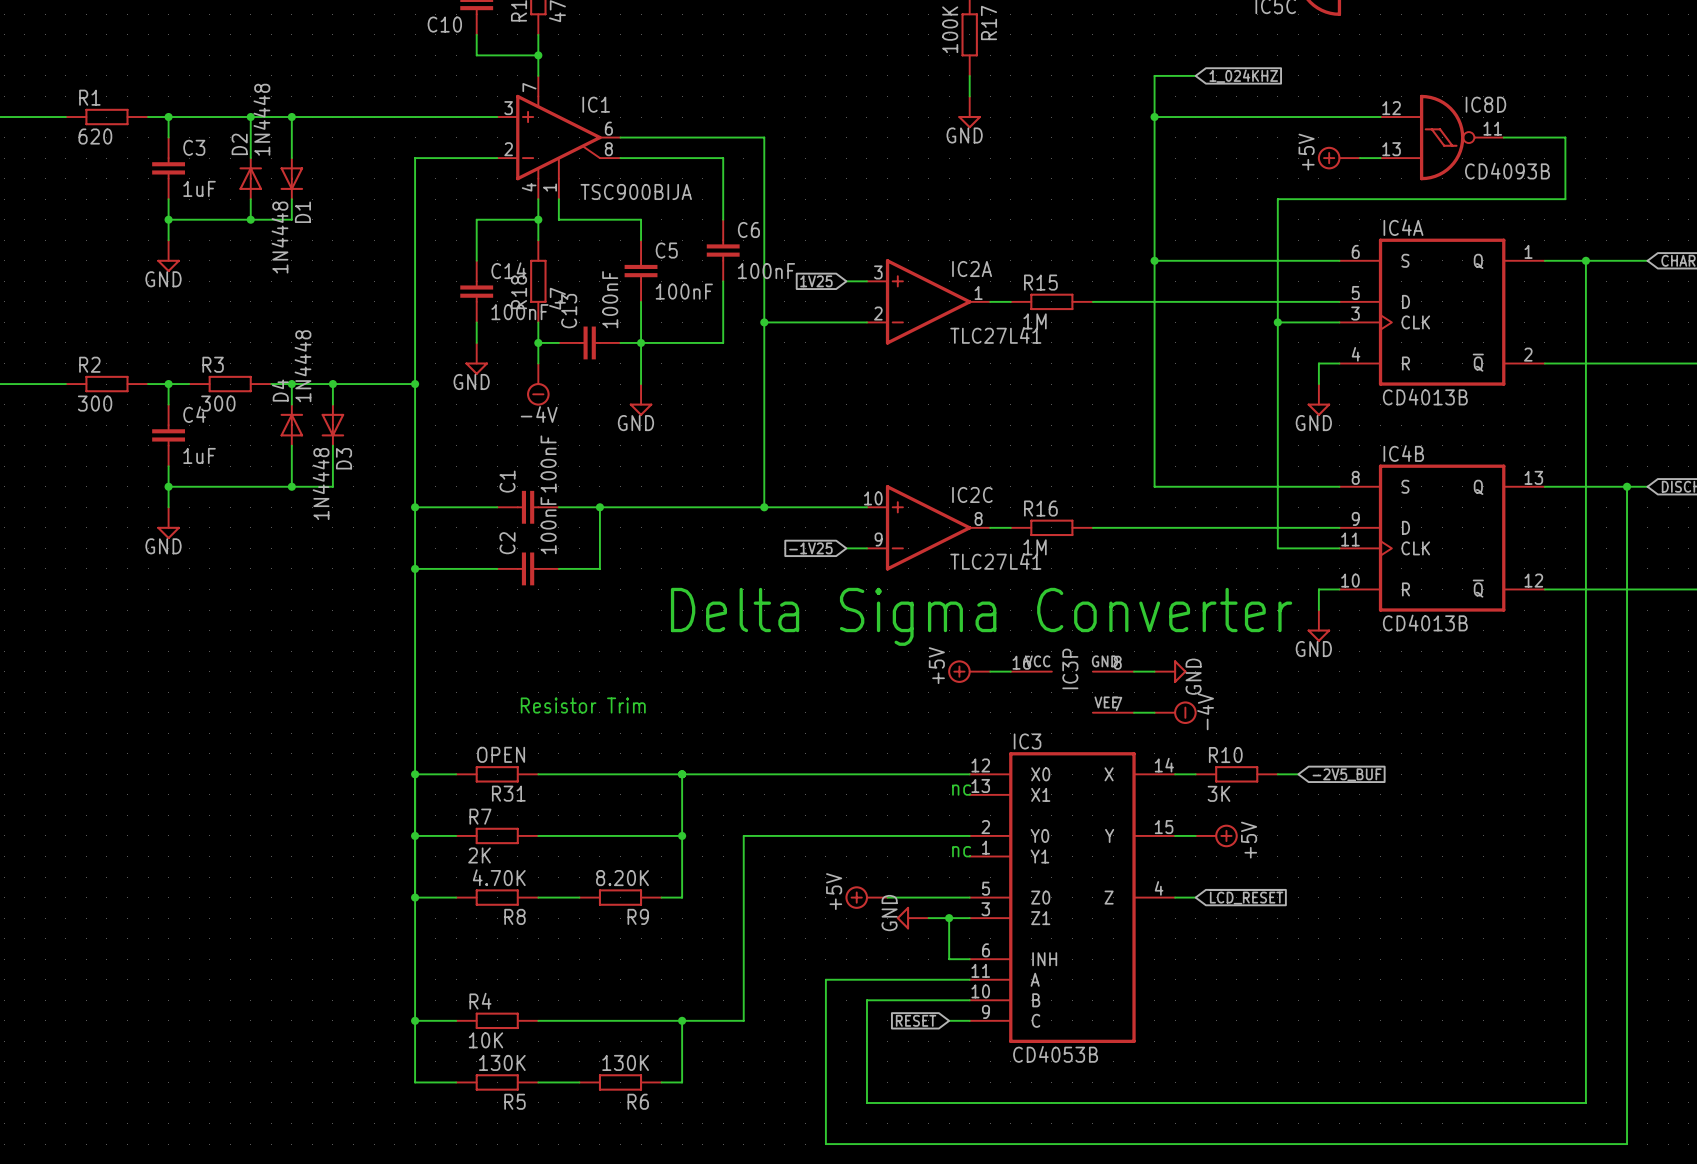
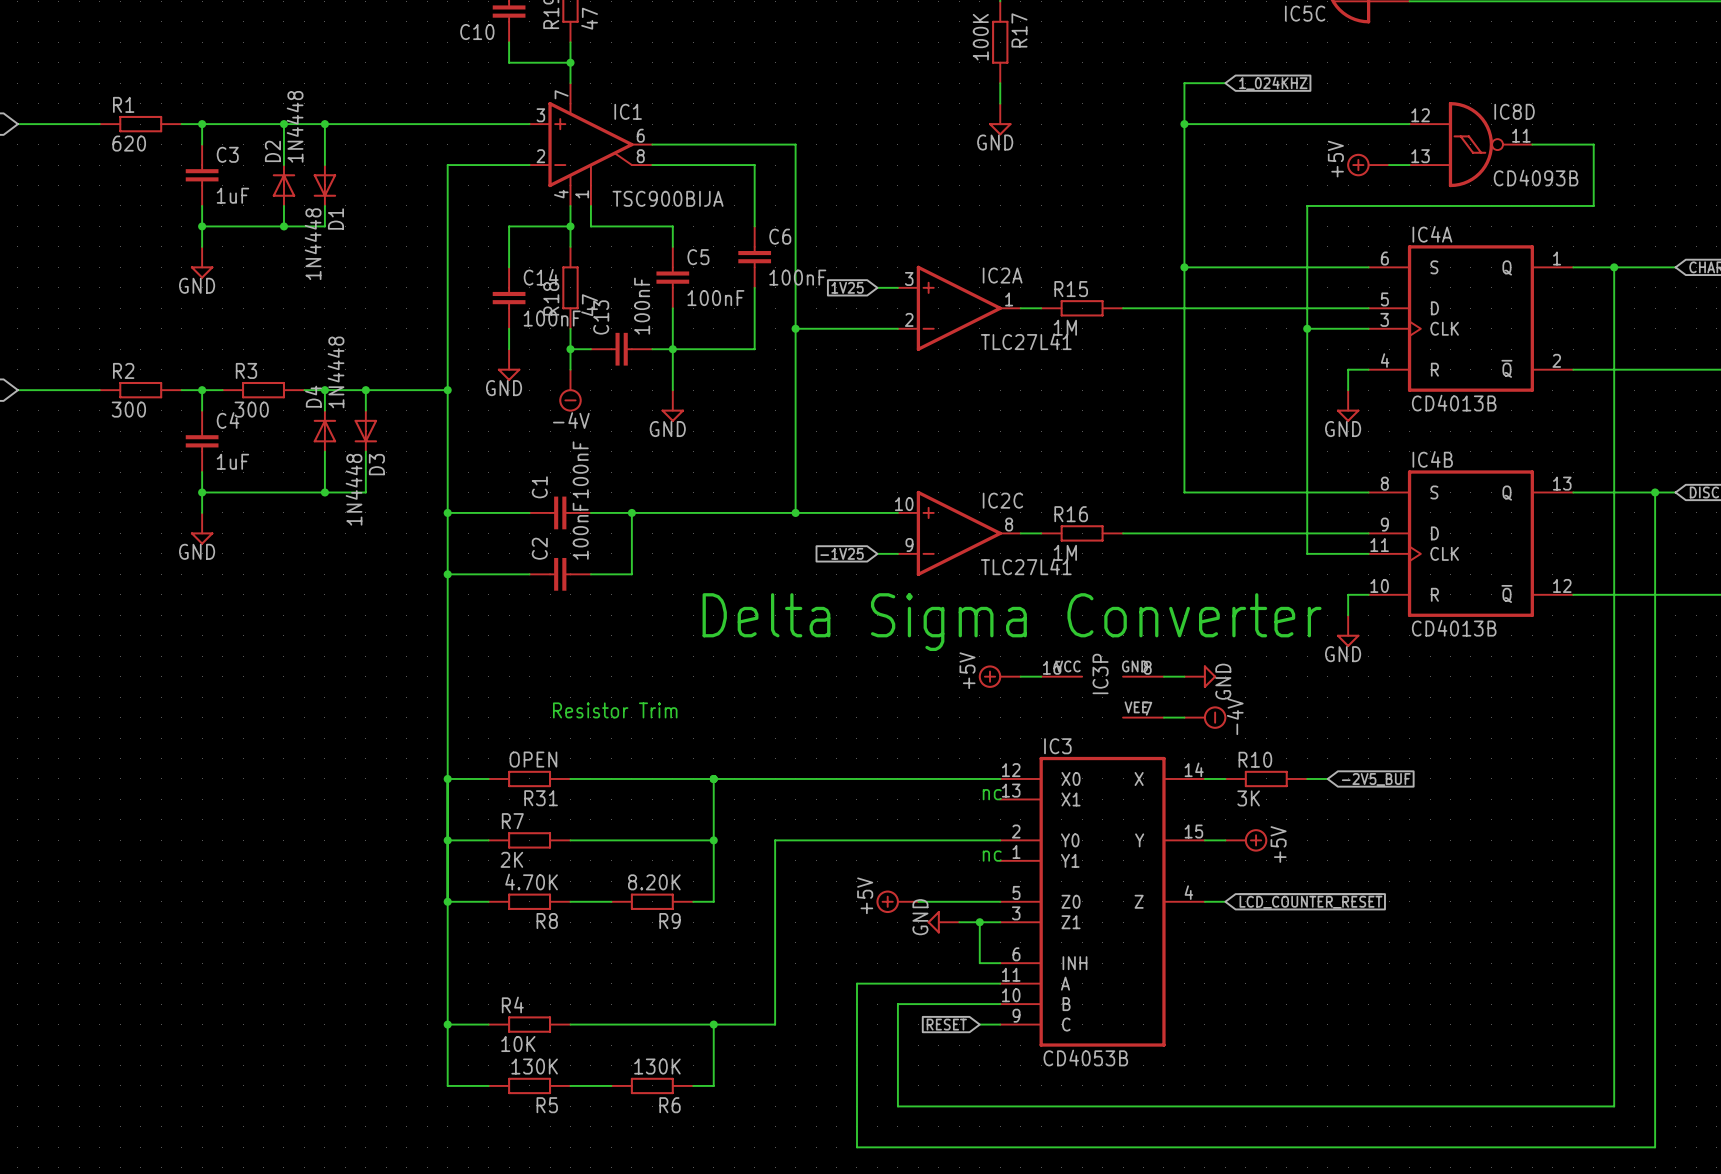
global label: ~{LCD_RESET} (1245, 896) -> ~{LCD_COUNTER_RESET} (1310, 901)

